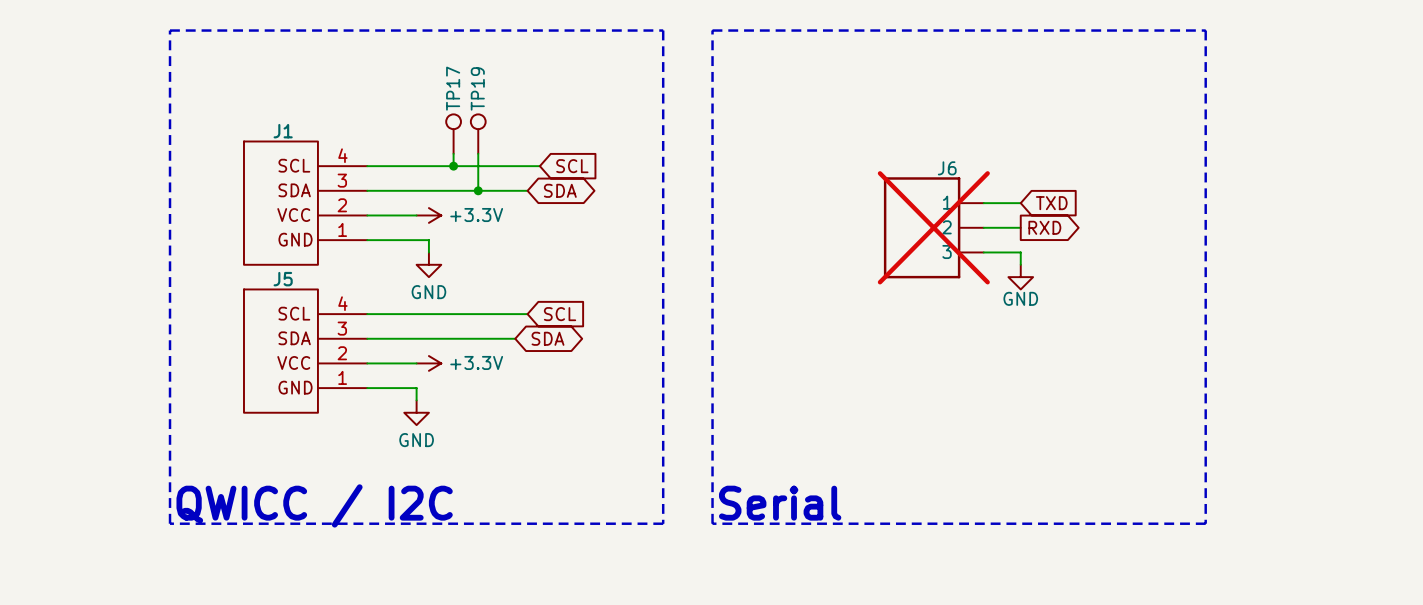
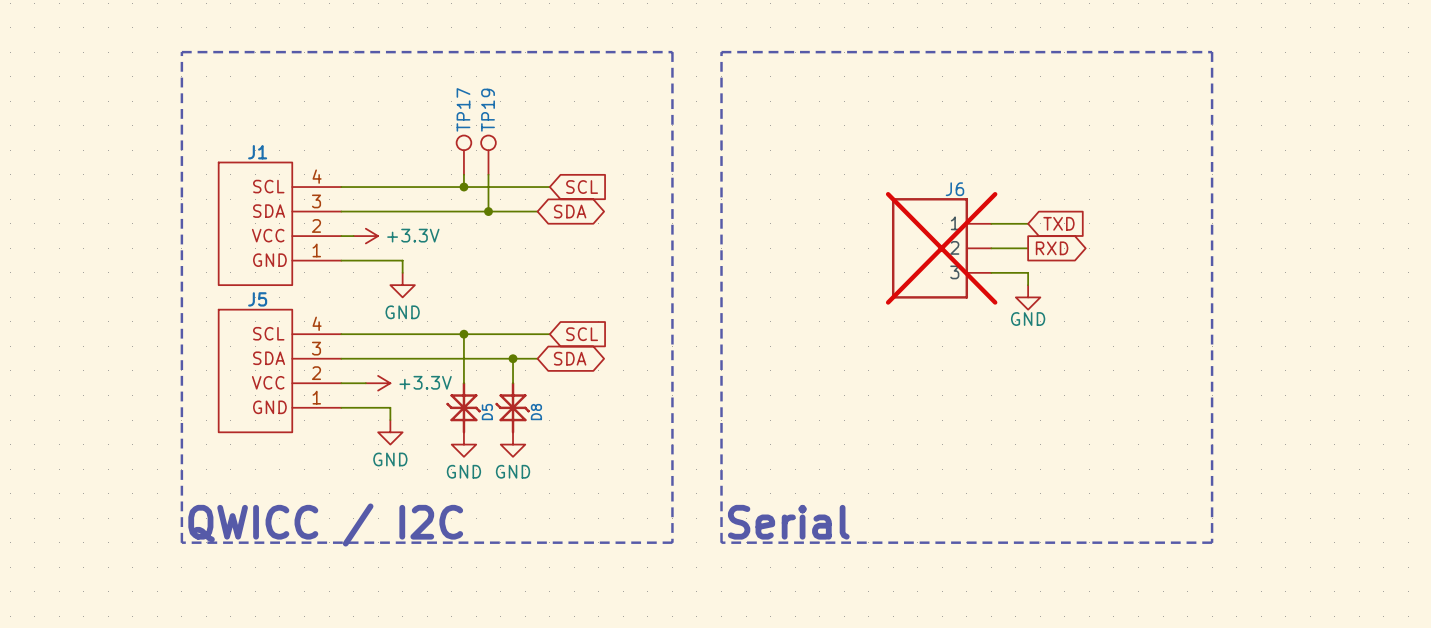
J1 position: (305, 203) -> (279, 223)
wire: (367, 215) (416, 215) -> none
power symbol position: +3.3V (428, 215) -> +3.3V (365, 236)
wire: (391, 240) (428, 240) (428, 252) -> (402, 260) (402, 272)
power symbol position: GND (428, 264) -> GND (402, 285)
wire: none -> (463, 334) (463, 383)
junction: none -> (463, 334)
wire: none -> (537, 334) (549, 334)
global label position: SCL (560, 314) -> SCL (582, 334)
wire: none -> (513, 358) (513, 383)
junction: none -> (513, 358)
wire: none -> (525, 358) (537, 358)
global label position: SDA (547, 338) -> SDA (570, 358)
J5 position: (305, 351) -> (279, 370)
wire: (367, 363) (416, 363) -> none
power symbol position: +3.3V (428, 363) -> +3.3V (378, 383)
wire: (379, 388) (416, 388) (416, 400) -> (390, 407) (390, 420)
D5: none -> (463, 407)
D8: none -> (512, 407)
power symbol: none -> GND (390, 432)
power symbol: GND (416, 412) -> none
power symbol: none -> GND (463, 444)
power symbol: none -> GND (513, 444)

